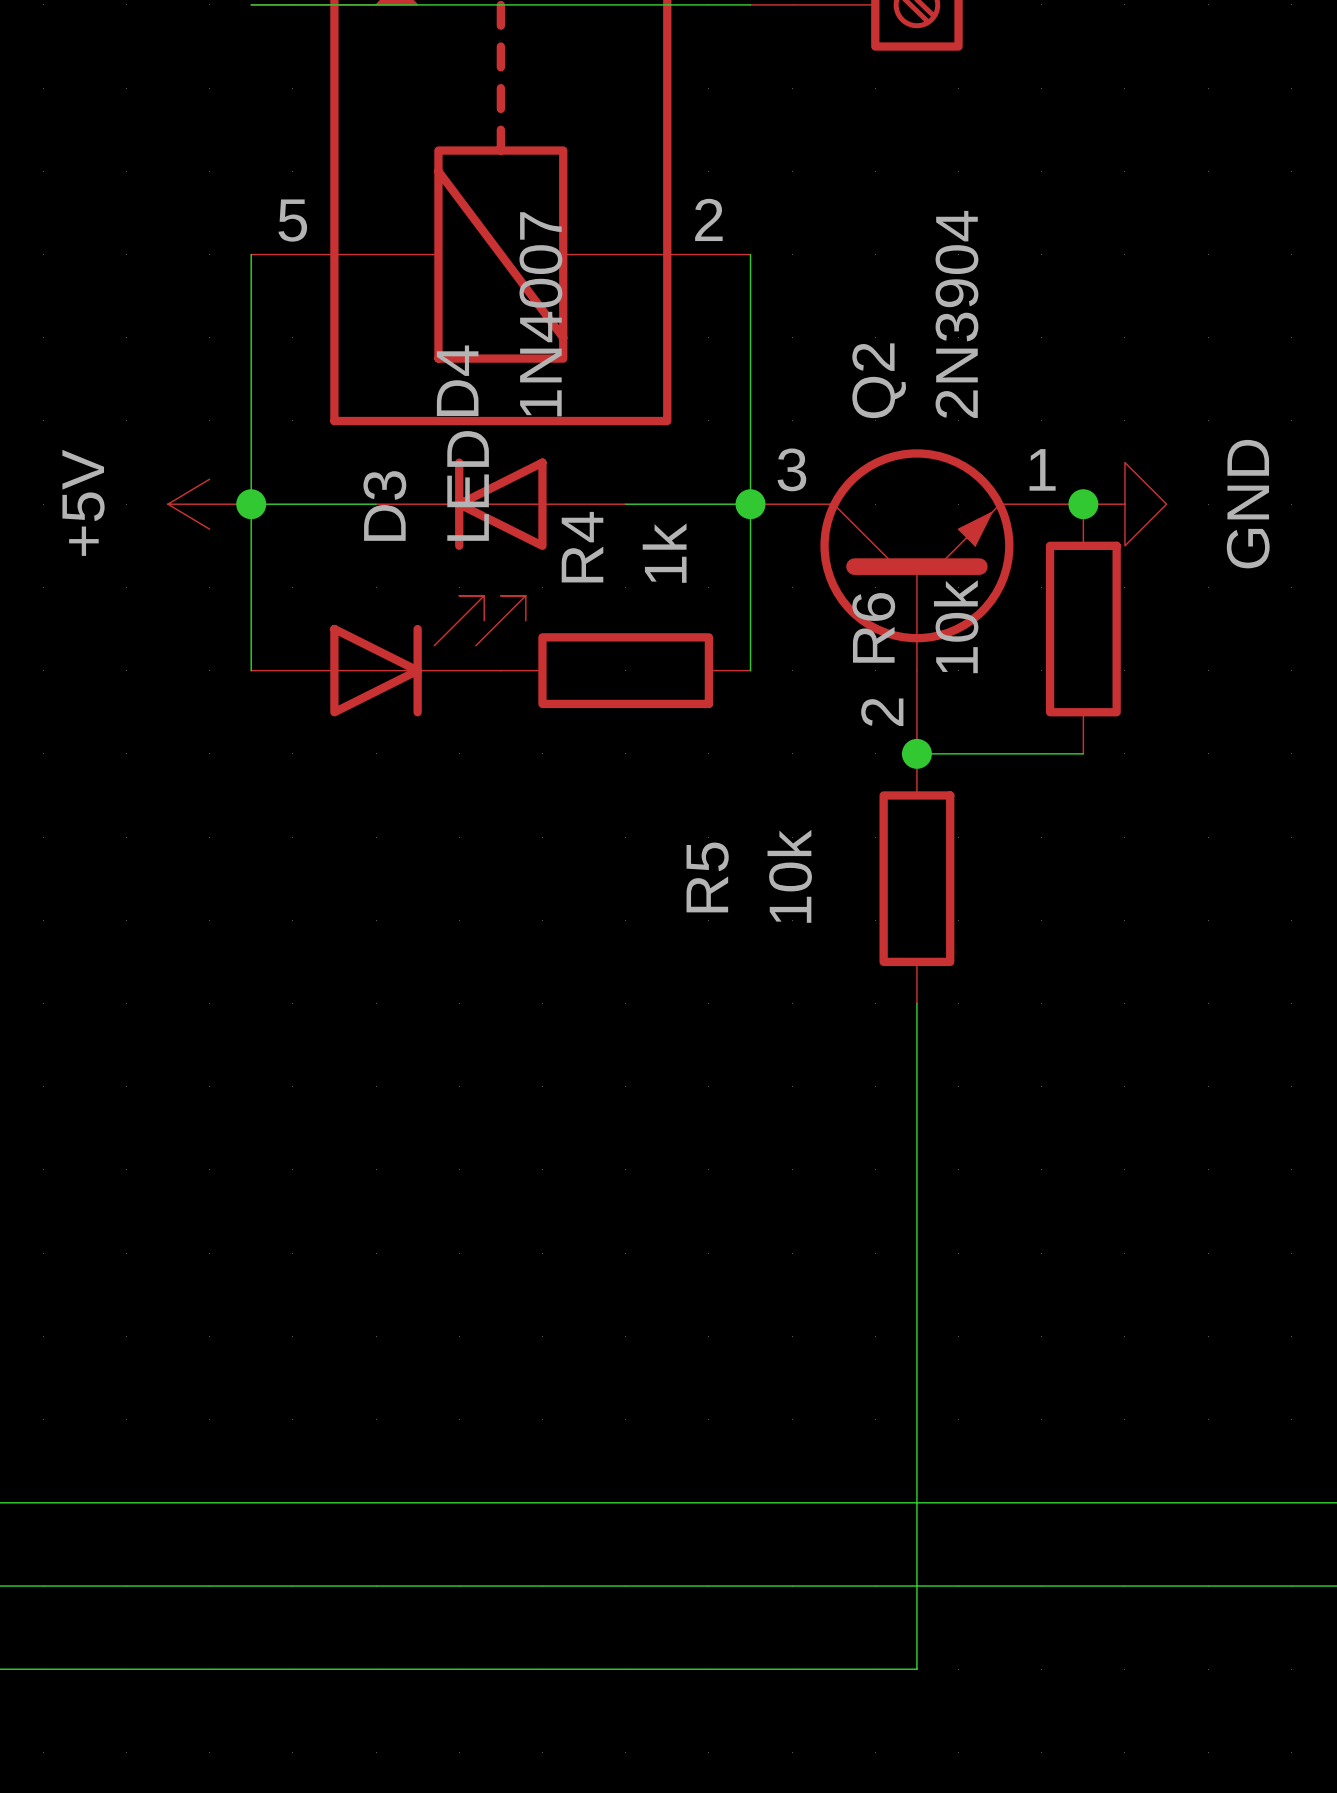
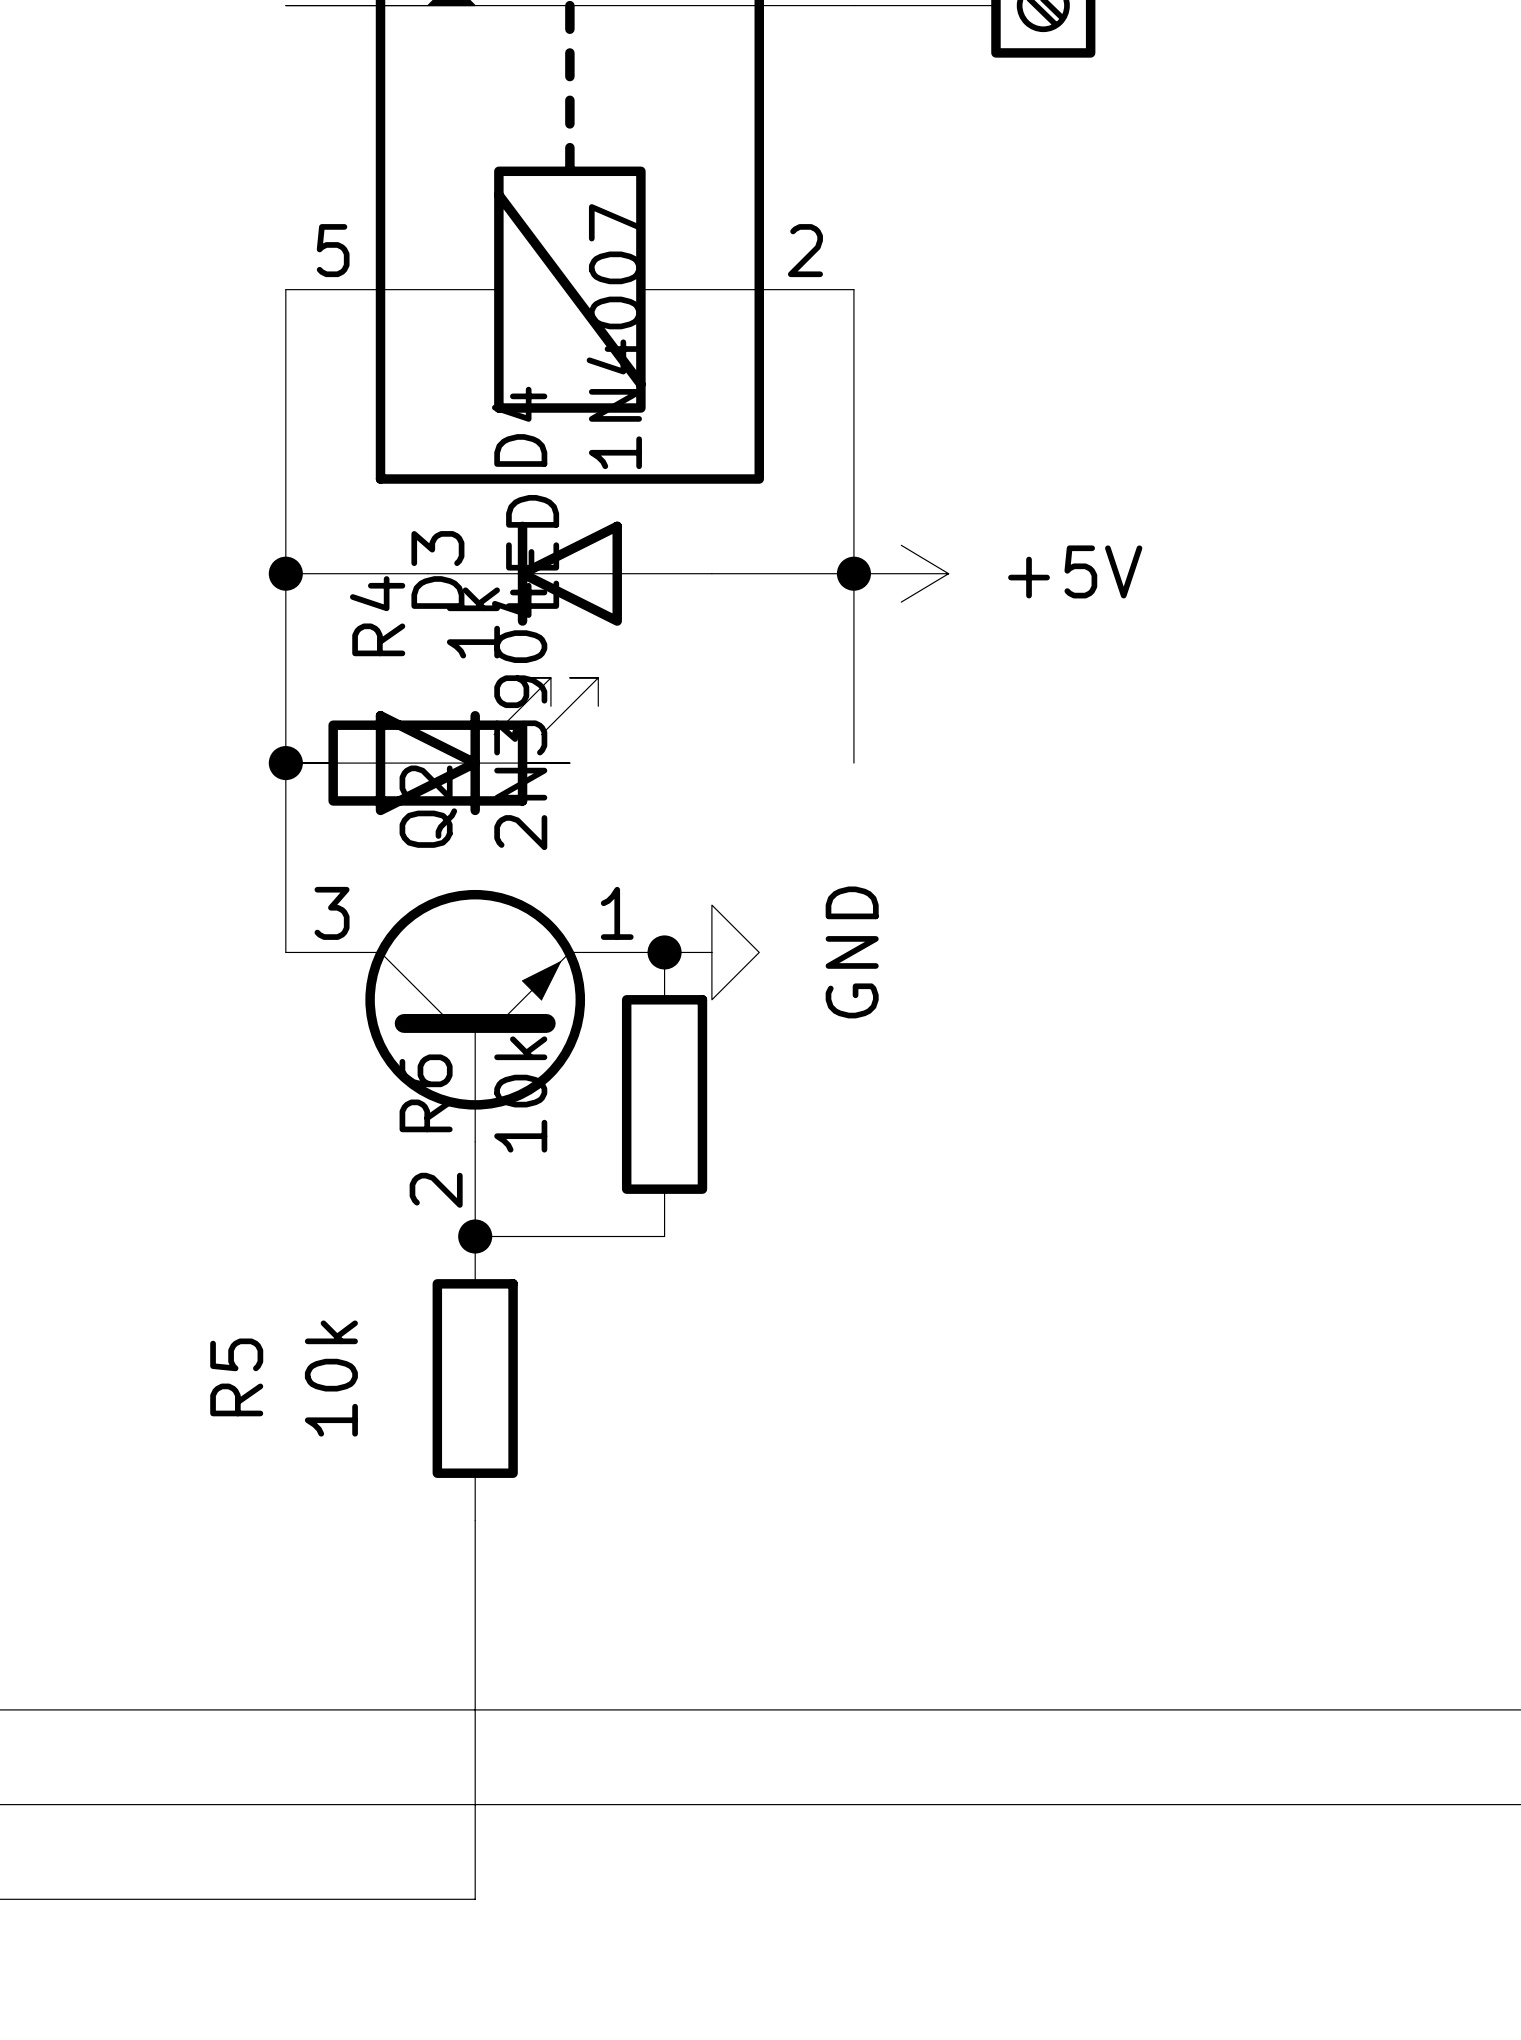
power symbol rotation: 0° (209, 504) -> 180° (901, 573)
power symbol position: +5V (209, 504) -> +5V (901, 573)
junction: (1083, 504) -> none
power symbol position: GND (1124, 504) -> GND (711, 952)
Q2 position: (916, 601) -> (475, 1063)
R6 position: (1083, 629) -> (664, 1094)
wire: none -> (285, 763) (285, 952)
junction: none -> (285, 763)
R4 position: (625, 670) -> (427, 763)
wire: (916, 753) (1083, 753) -> (475, 1236) (664, 1236)
junction: (916, 753) -> none
junction: none -> (664, 952)
R5 position: (916, 878) -> (475, 1378)
wire: (916, 1003) (916, 1669) (417, 1669) -> (475, 1520) (475, 1899)
junction: none -> (475, 1236)

